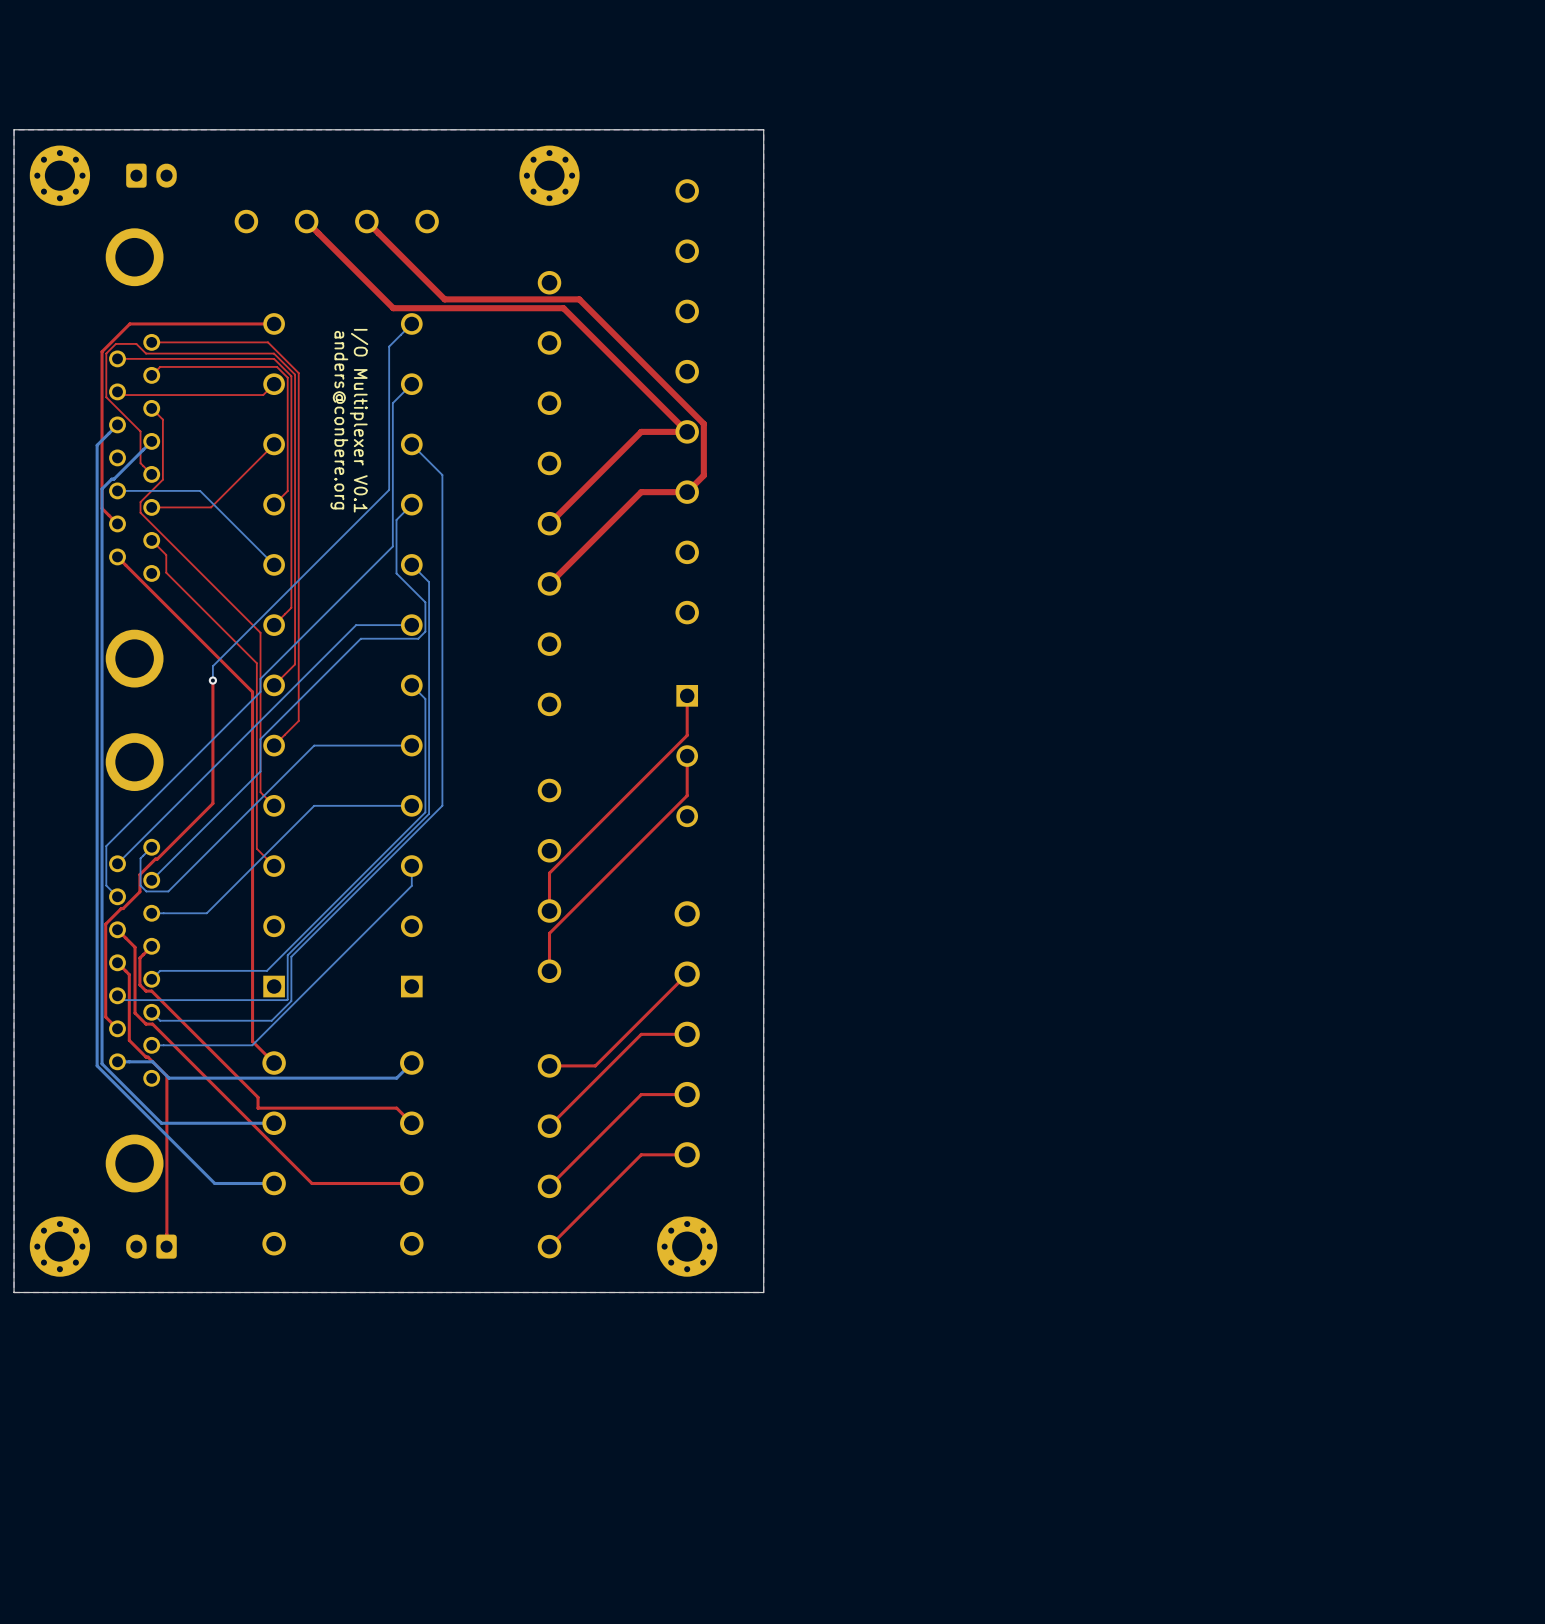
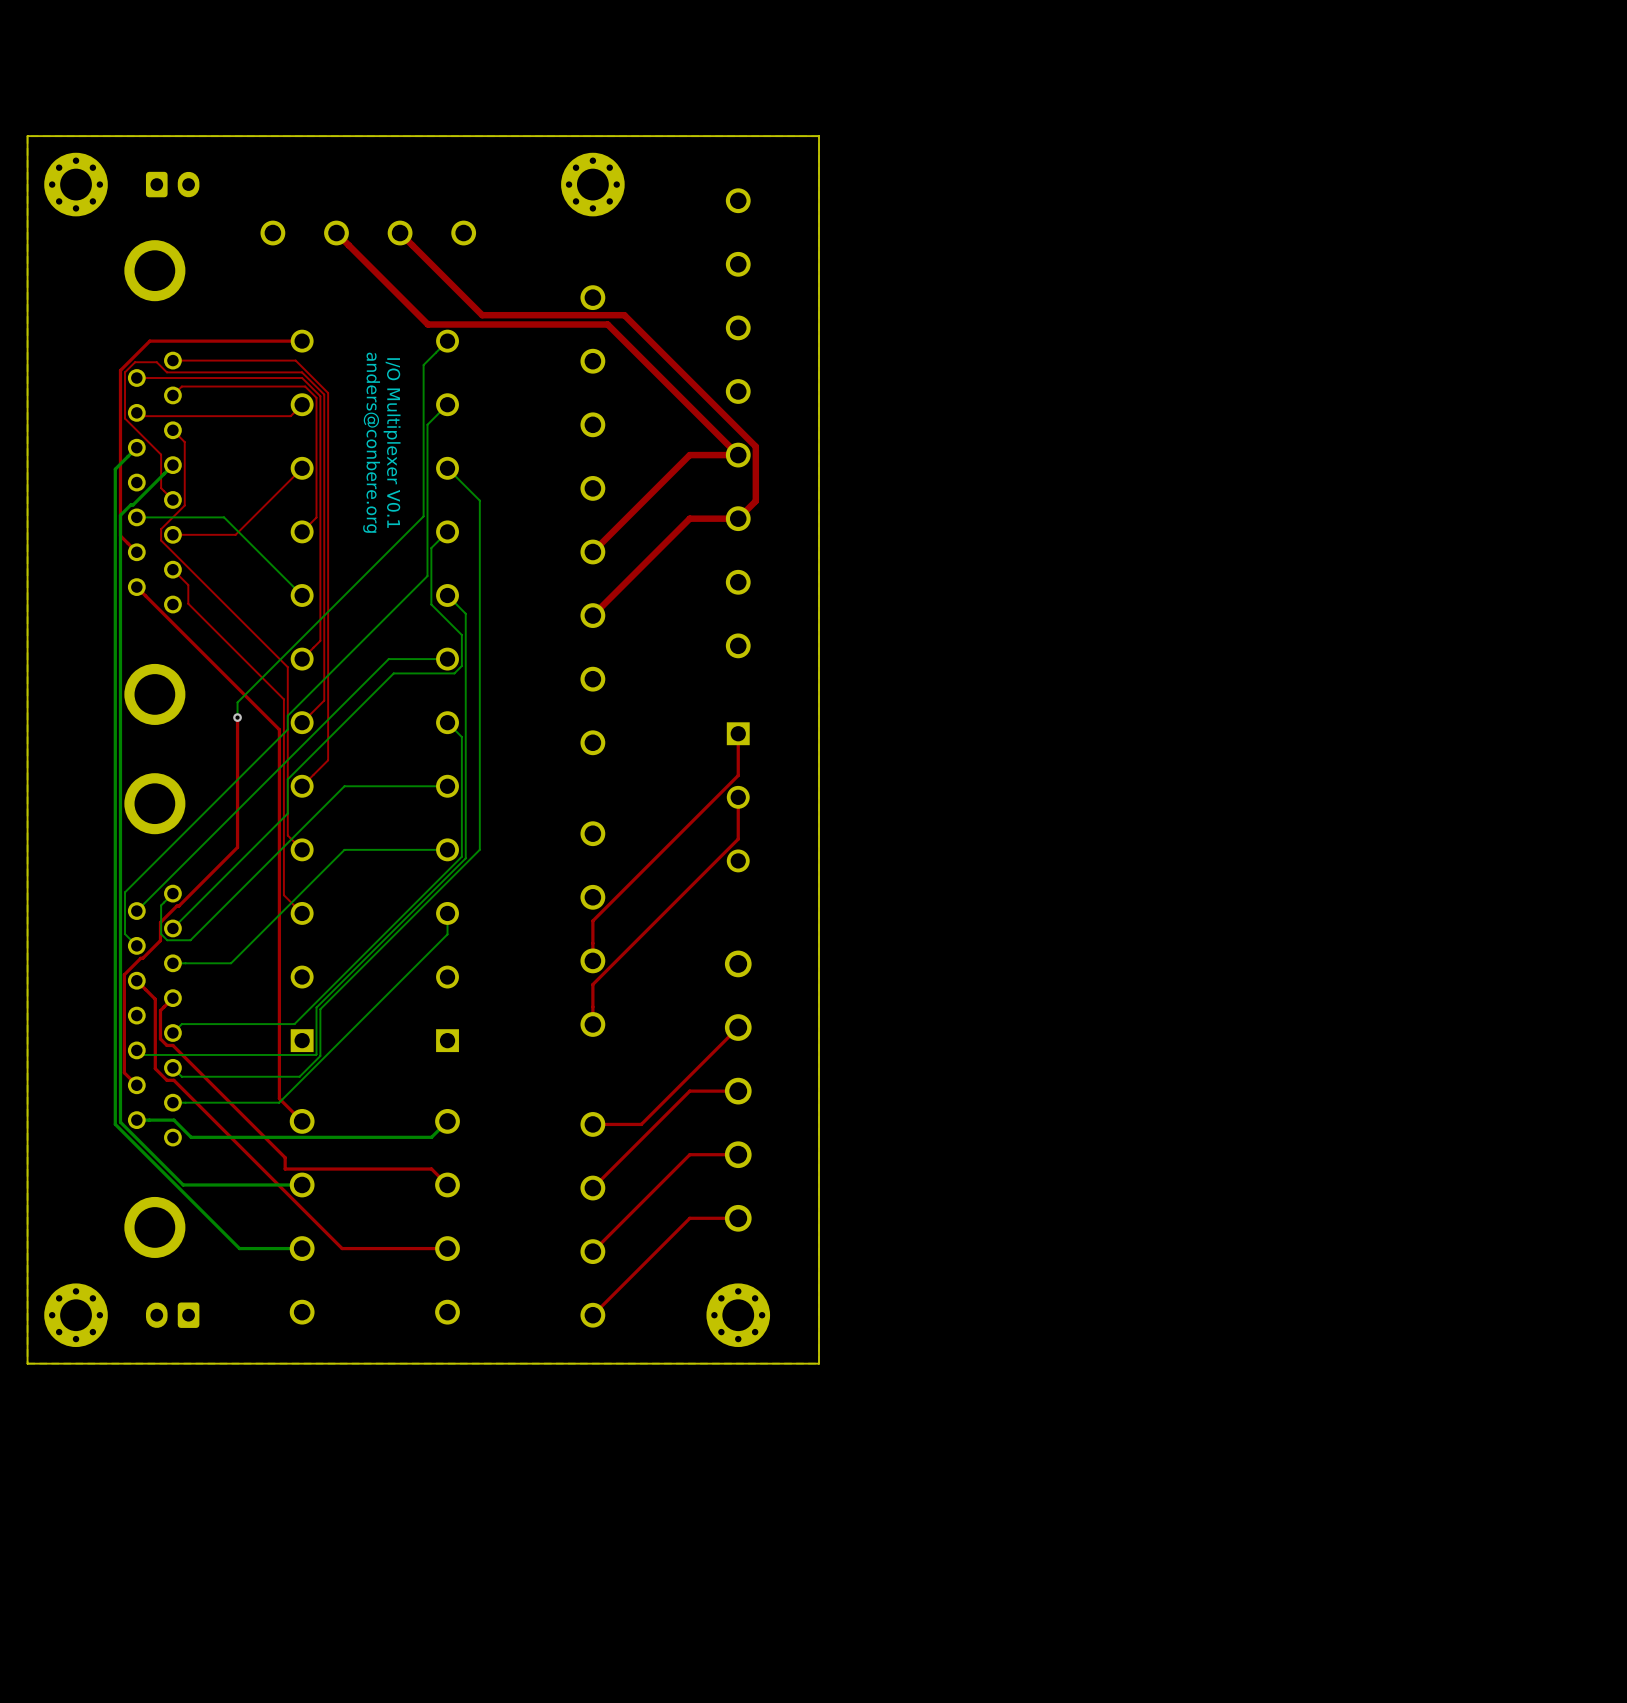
top track: (117, 962) (129, 974) (129, 1040) (166, 1076) (166, 1246) -> none

